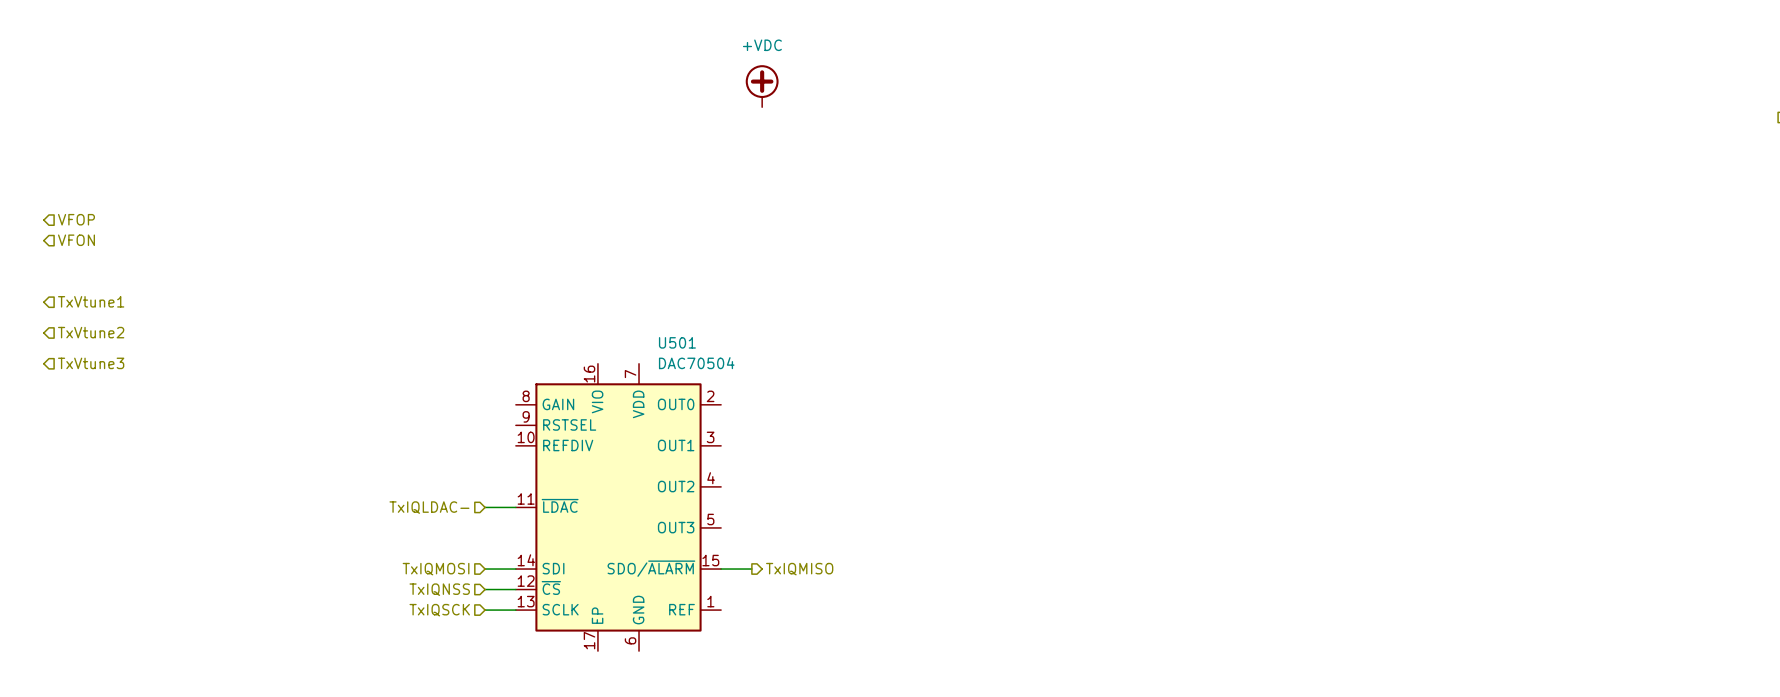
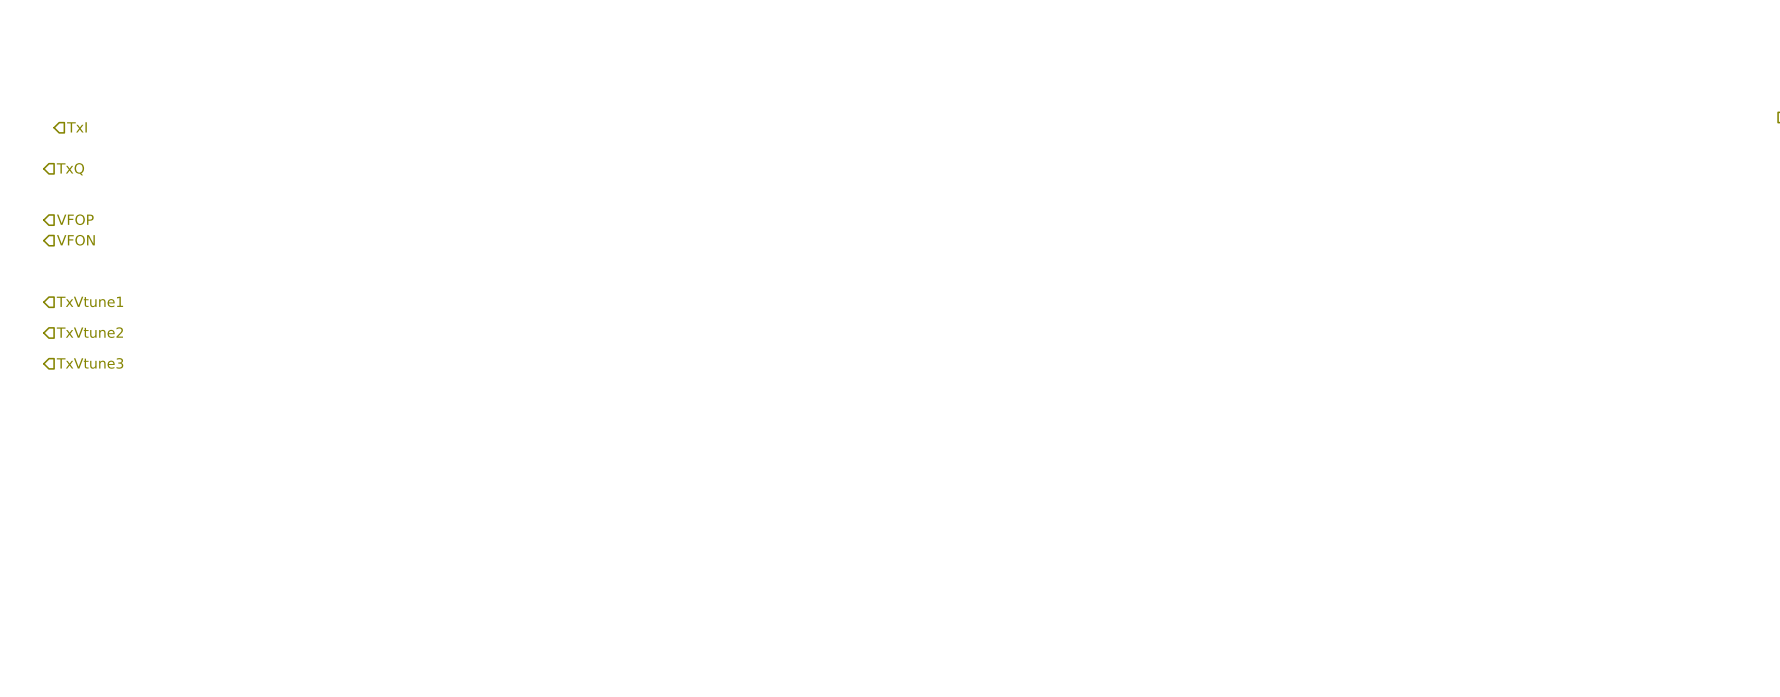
power symbol: +VDC (762, 86) -> none
hierarchical label: none -> TxI (76, 127)
hierarchical label: none -> TxQ (70, 169)
hierarchical label: TxIQLDAC- (429, 507) -> none
wire: (485, 507) (515, 507) -> none
U501: DAC70504 (618, 507) -> none
hierarchical label: TxIQMOSI (436, 569) -> none
wire: (485, 569) (515, 569) -> none
wire: (721, 569) (751, 569) -> none
hierarchical label: TxIQMISO (799, 569) -> none
hierarchical label: TxIQNSS (439, 589) -> none
wire: (485, 589) (515, 589) -> none
hierarchical label: TxIQSCK (439, 610) -> none
wire: (485, 610) (515, 610) -> none

